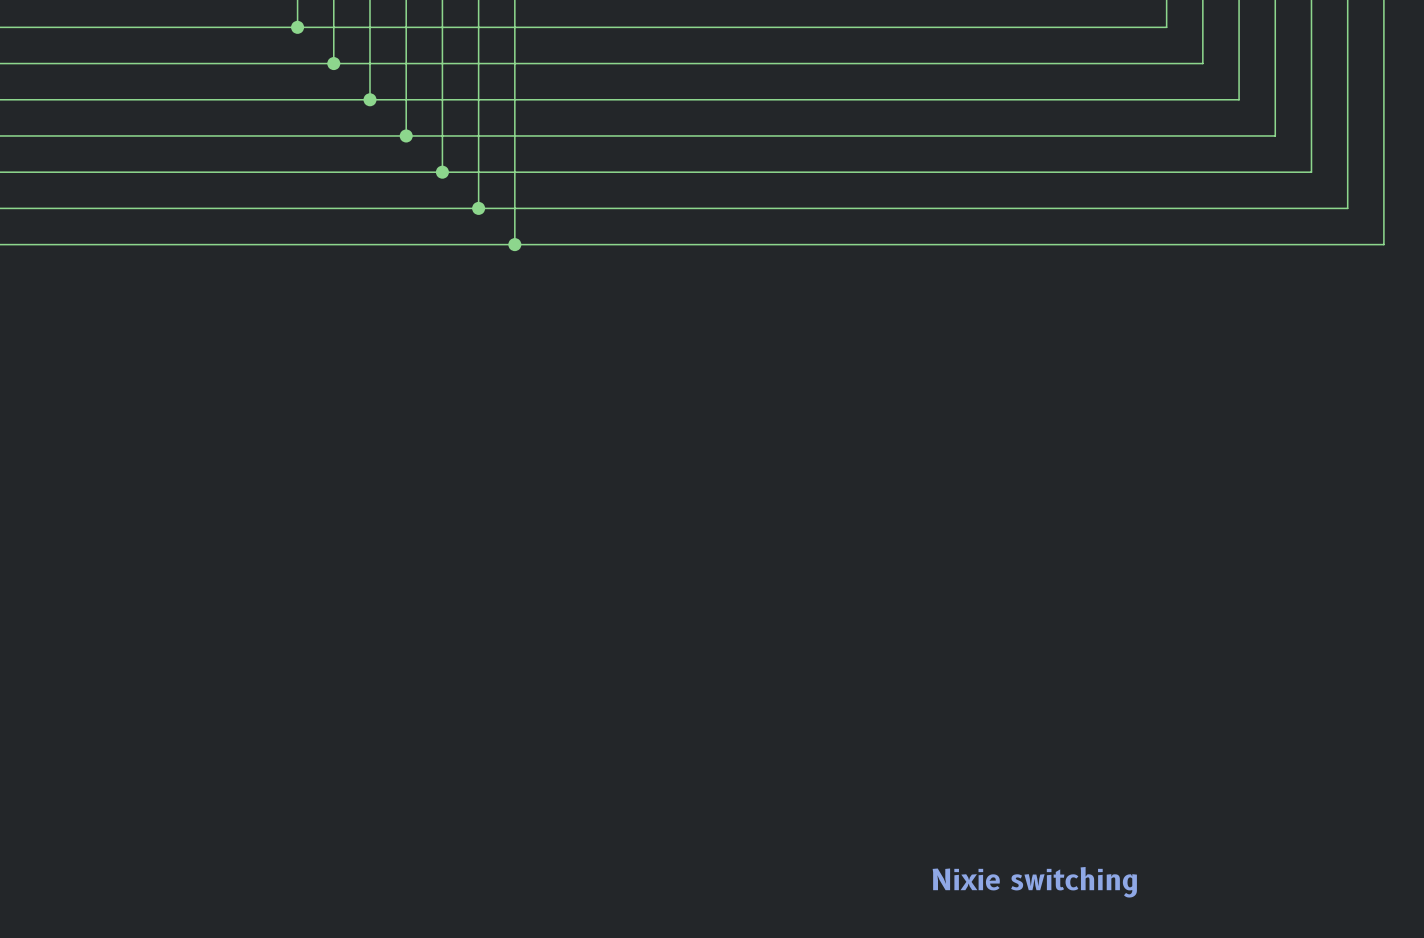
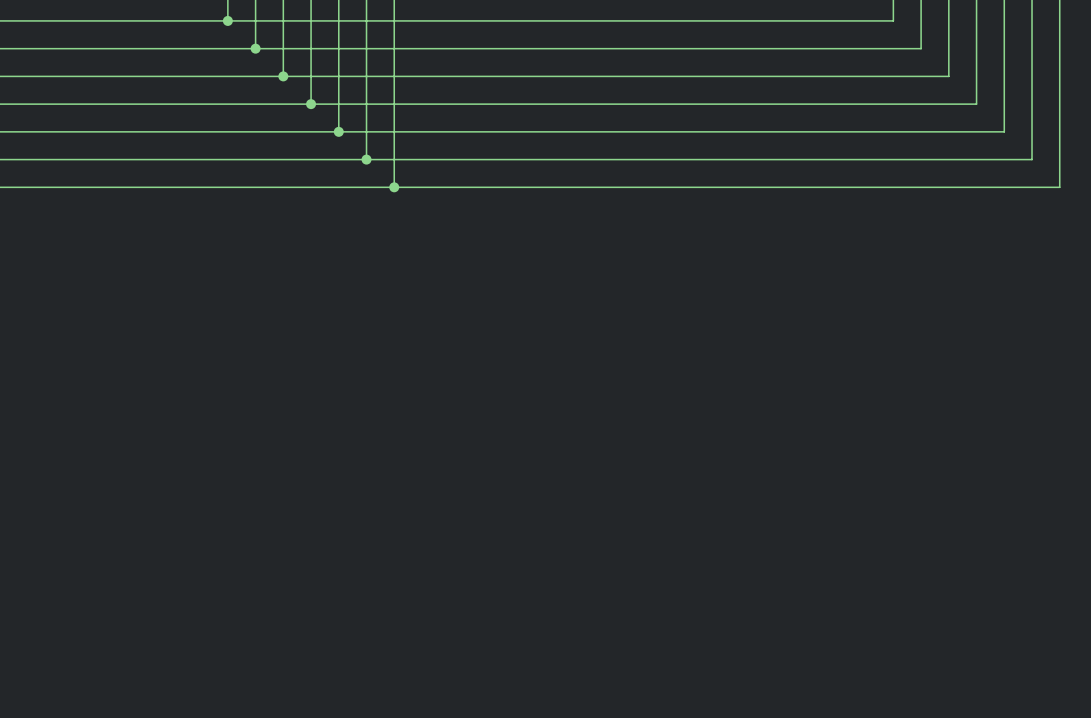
text: Nixie switching (1034, 882) -> none

